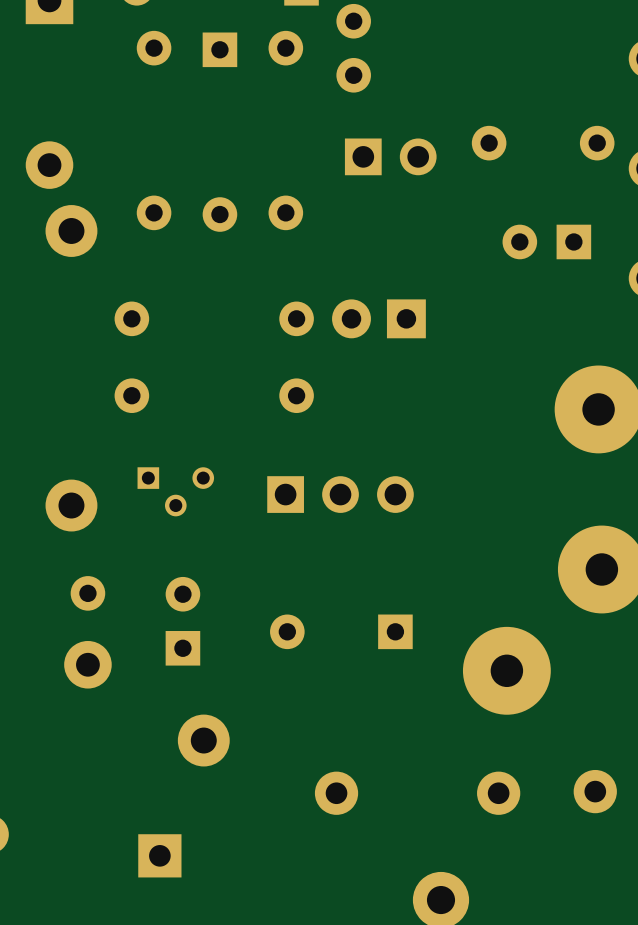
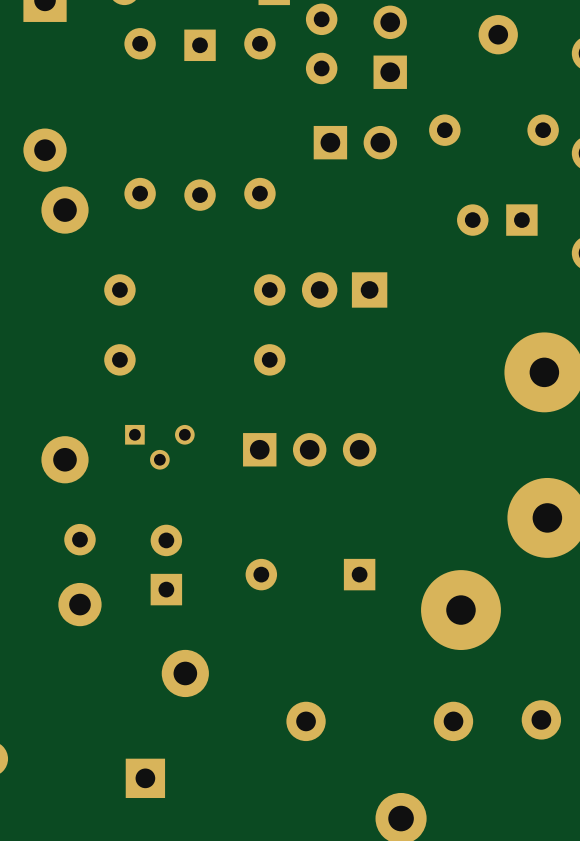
part: none -> (498, 34)
part: none -> (390, 47)

